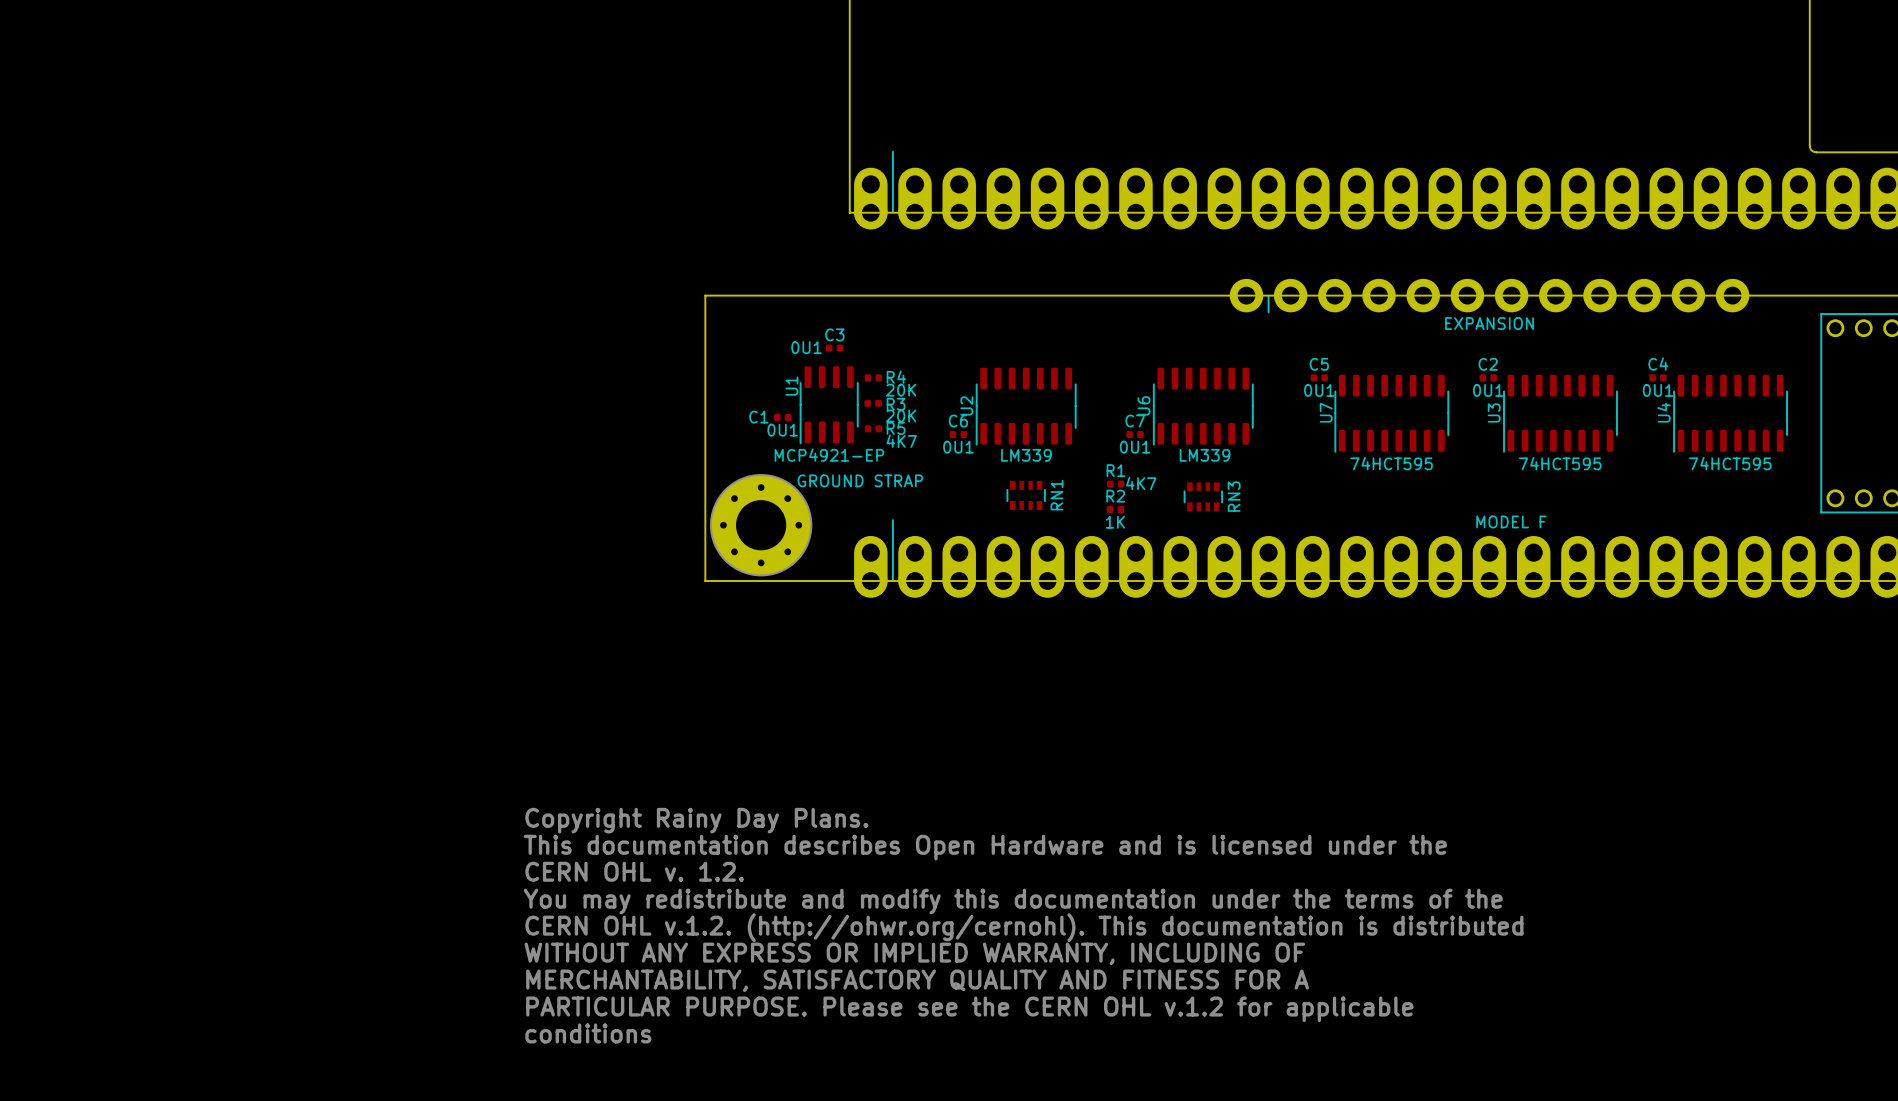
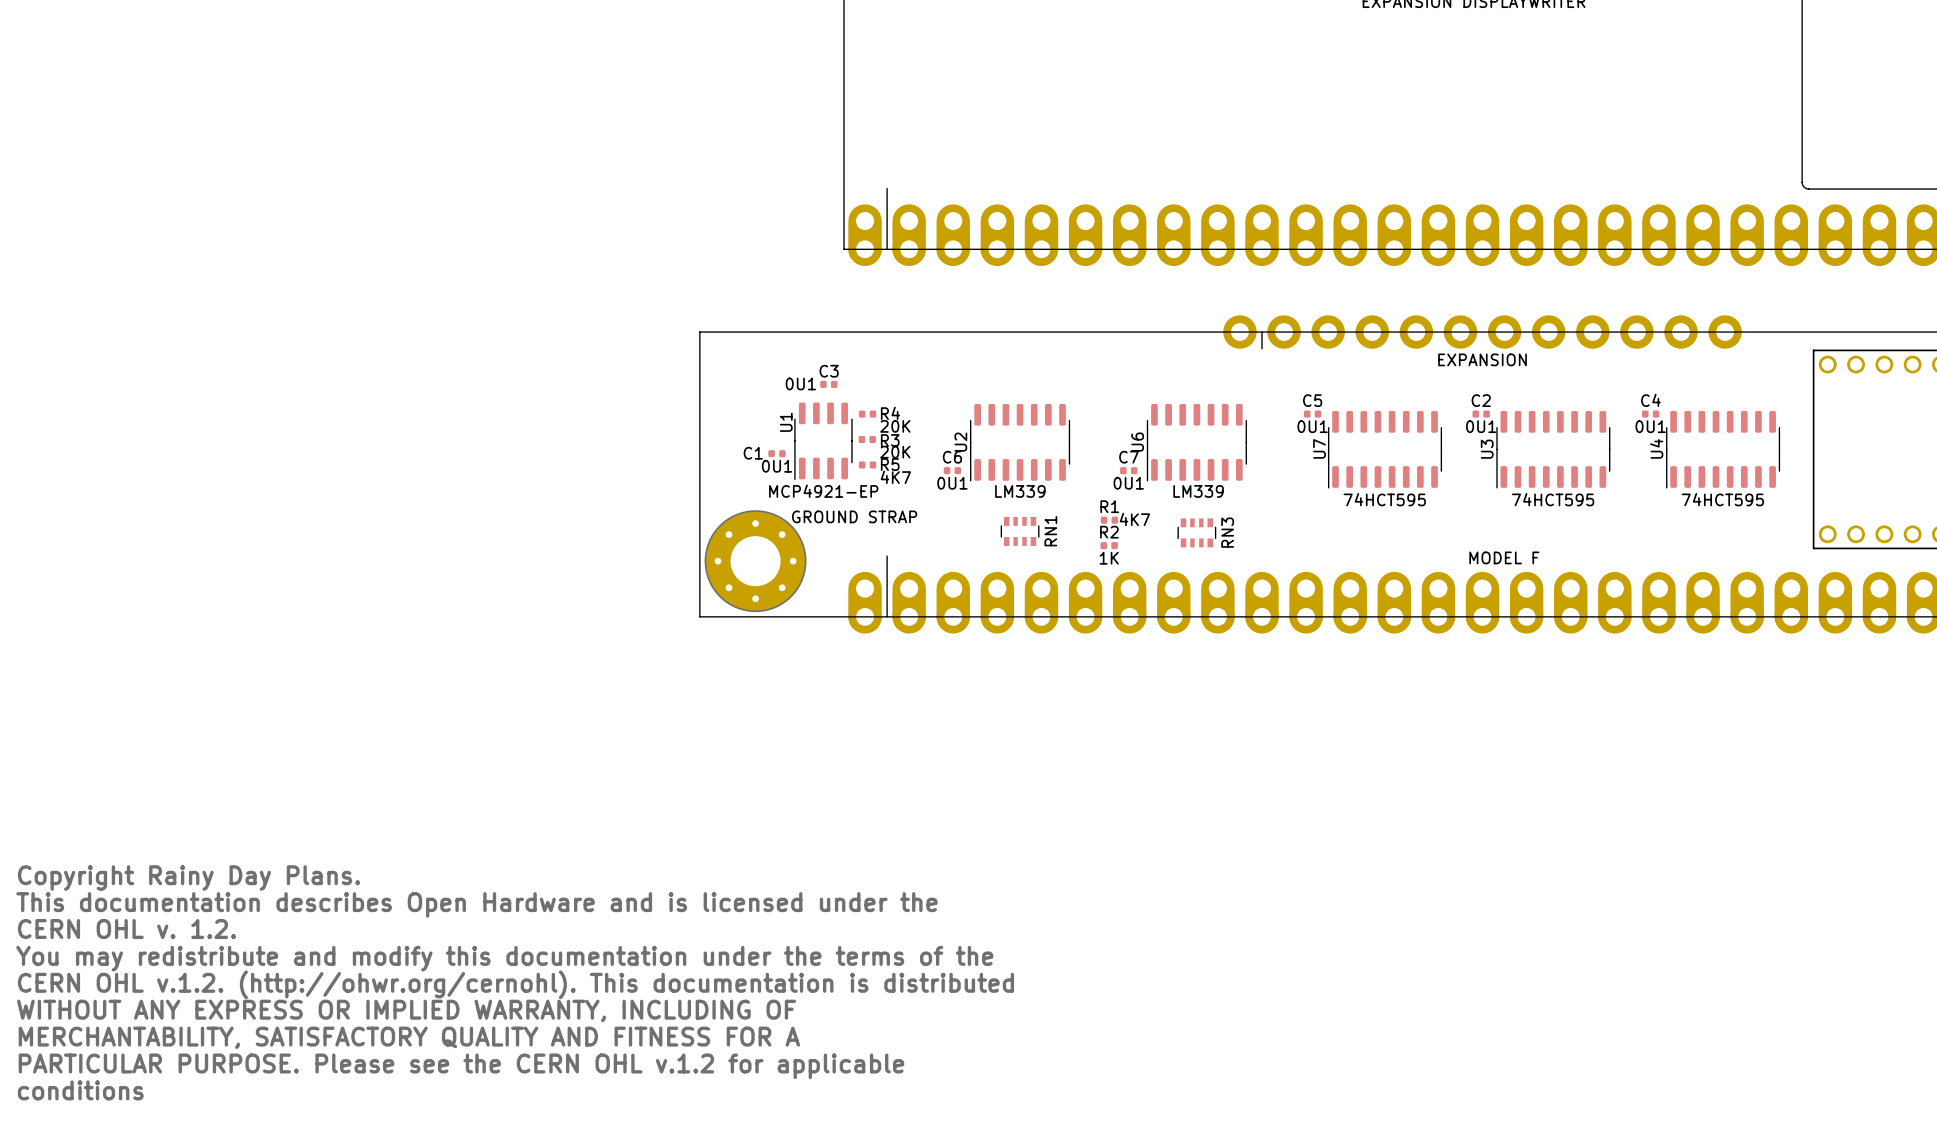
text: Copyright Rainy Day Plans. (696, 820) -> none
text: none -> Copyright Rainy Day Plans. (189, 878)
text: This documentation describes Open Hardware and is licensed under the (985, 847) -> none
text: none -> This documentation describes Open Hardware and is licensed under the (476, 904)
text: CERN OHL v. 1.2. (634, 871) -> none
text: none -> CERN OHL v. 1.2. (126, 929)
text: You may redistribute and modify this documentation under the terms of the (1013, 901) -> none
text: none -> You may redistribute and modify this documentation under the terms of the (504, 958)
text: CERN OHL v.1.2. (http://ohwr.org/cernohl). This documentation is distributed (1024, 927) -> none
text: none -> CERN OHL v.1.2. (http://ohwr.org/cernohl). This documentation is distributed (515, 984)
text: WITHOUT ANY EXPRESS OR IMPLIED WARRANTY, INCLUDING OF (914, 953) -> none
text: none -> WITHOUT ANY EXPRESS OR IMPLIED WARRANTY, INCLUDING OF (406, 1010)
text: MERCHANTABILITY, SATISFACTORY QUALITY AND FITNESS FOR A (917, 980) -> none
text: none -> MERCHANTABILITY, SATISFACTORY QUALITY AND FITNESS FOR A (409, 1037)
text: PARTICULAR PURPOSE. Please see the CERN OHL v.1.2 for applicable (969, 1009) -> none
text: none -> PARTICULAR PURPOSE. Please see the CERN OHL v.1.2 for applicable (461, 1066)
text: conditions (588, 1033) -> none
text: none -> conditions (80, 1090)

